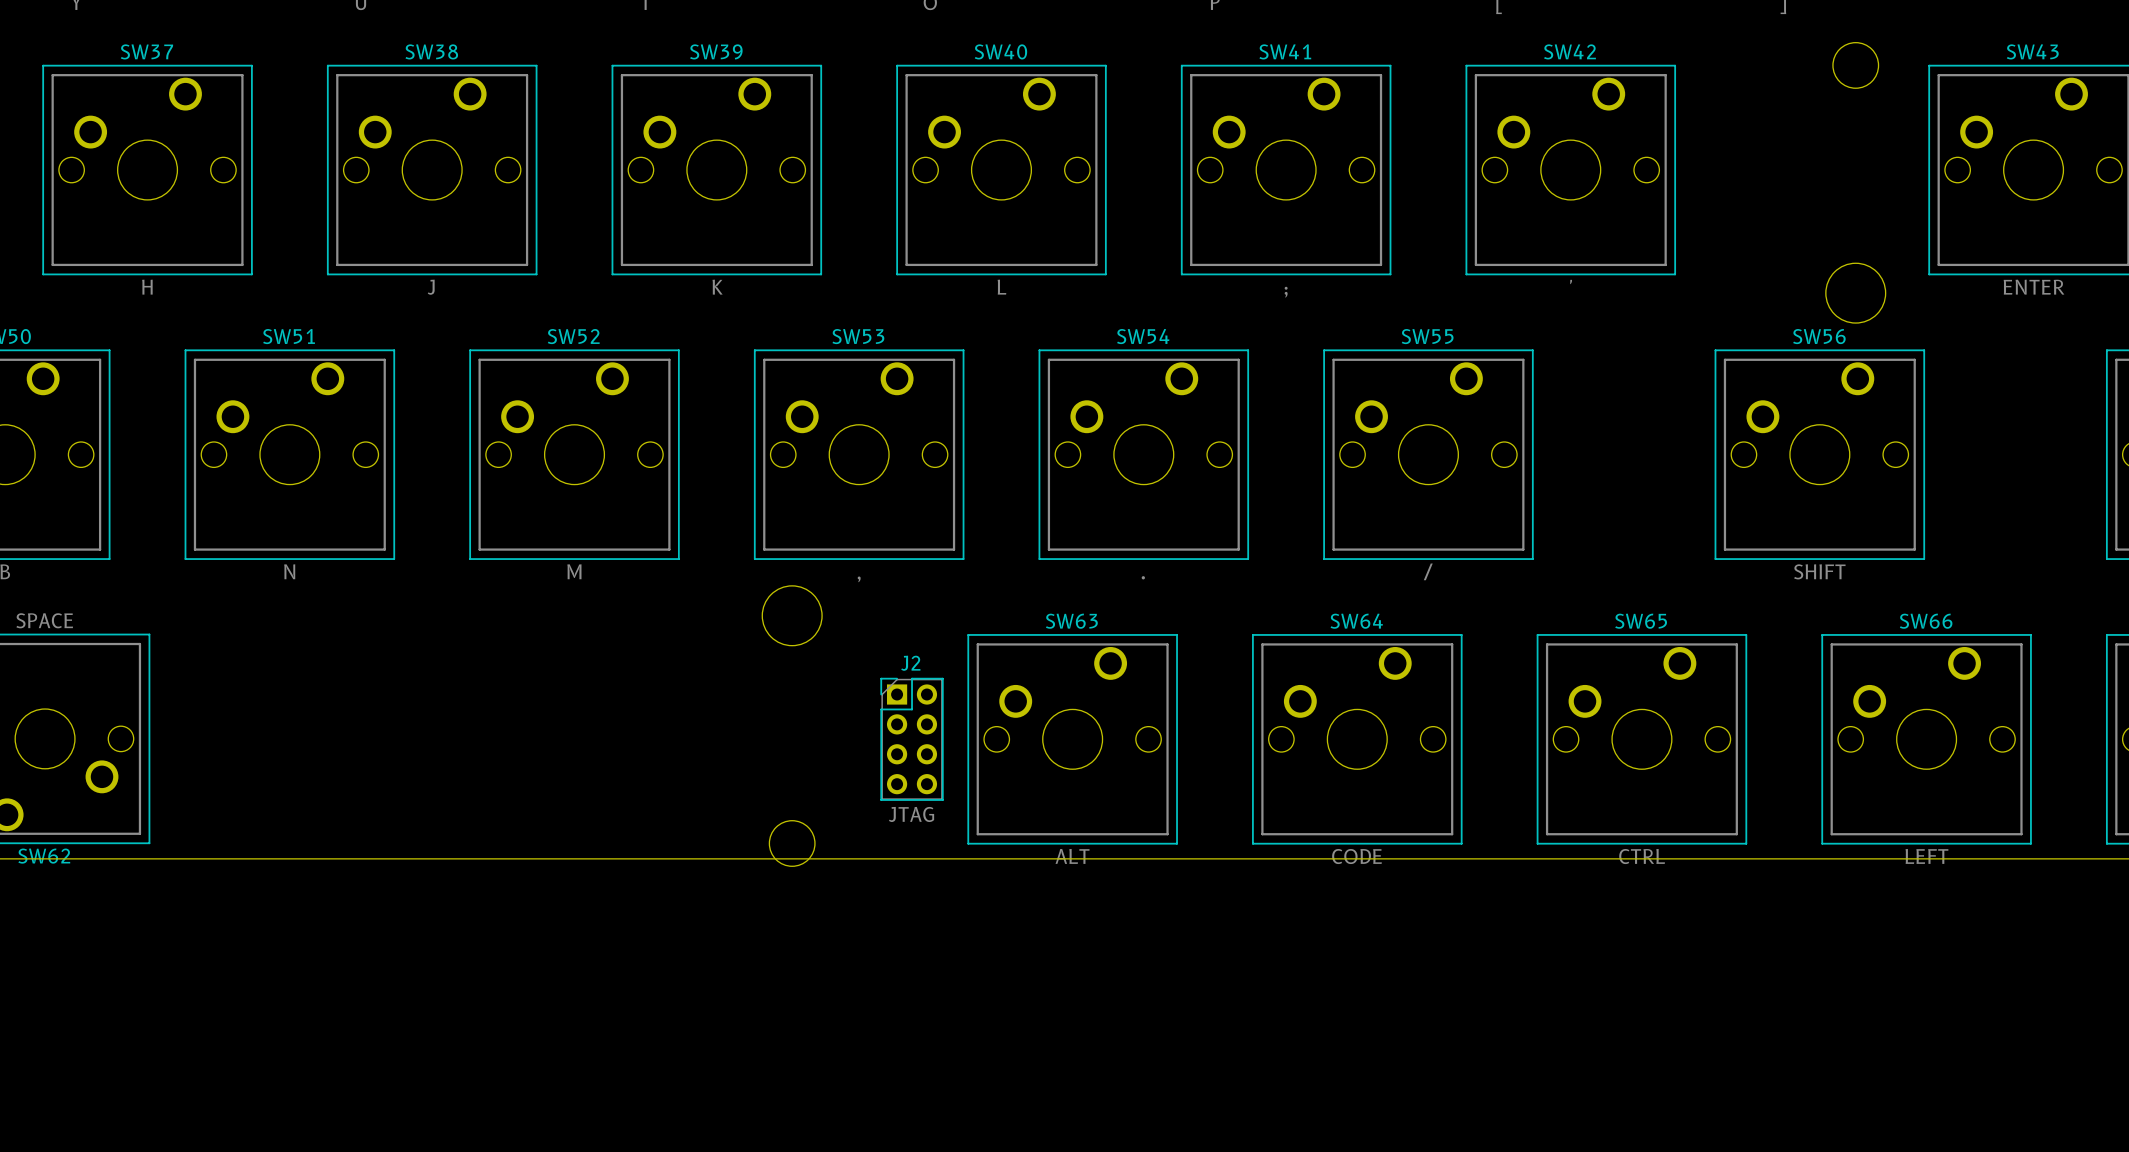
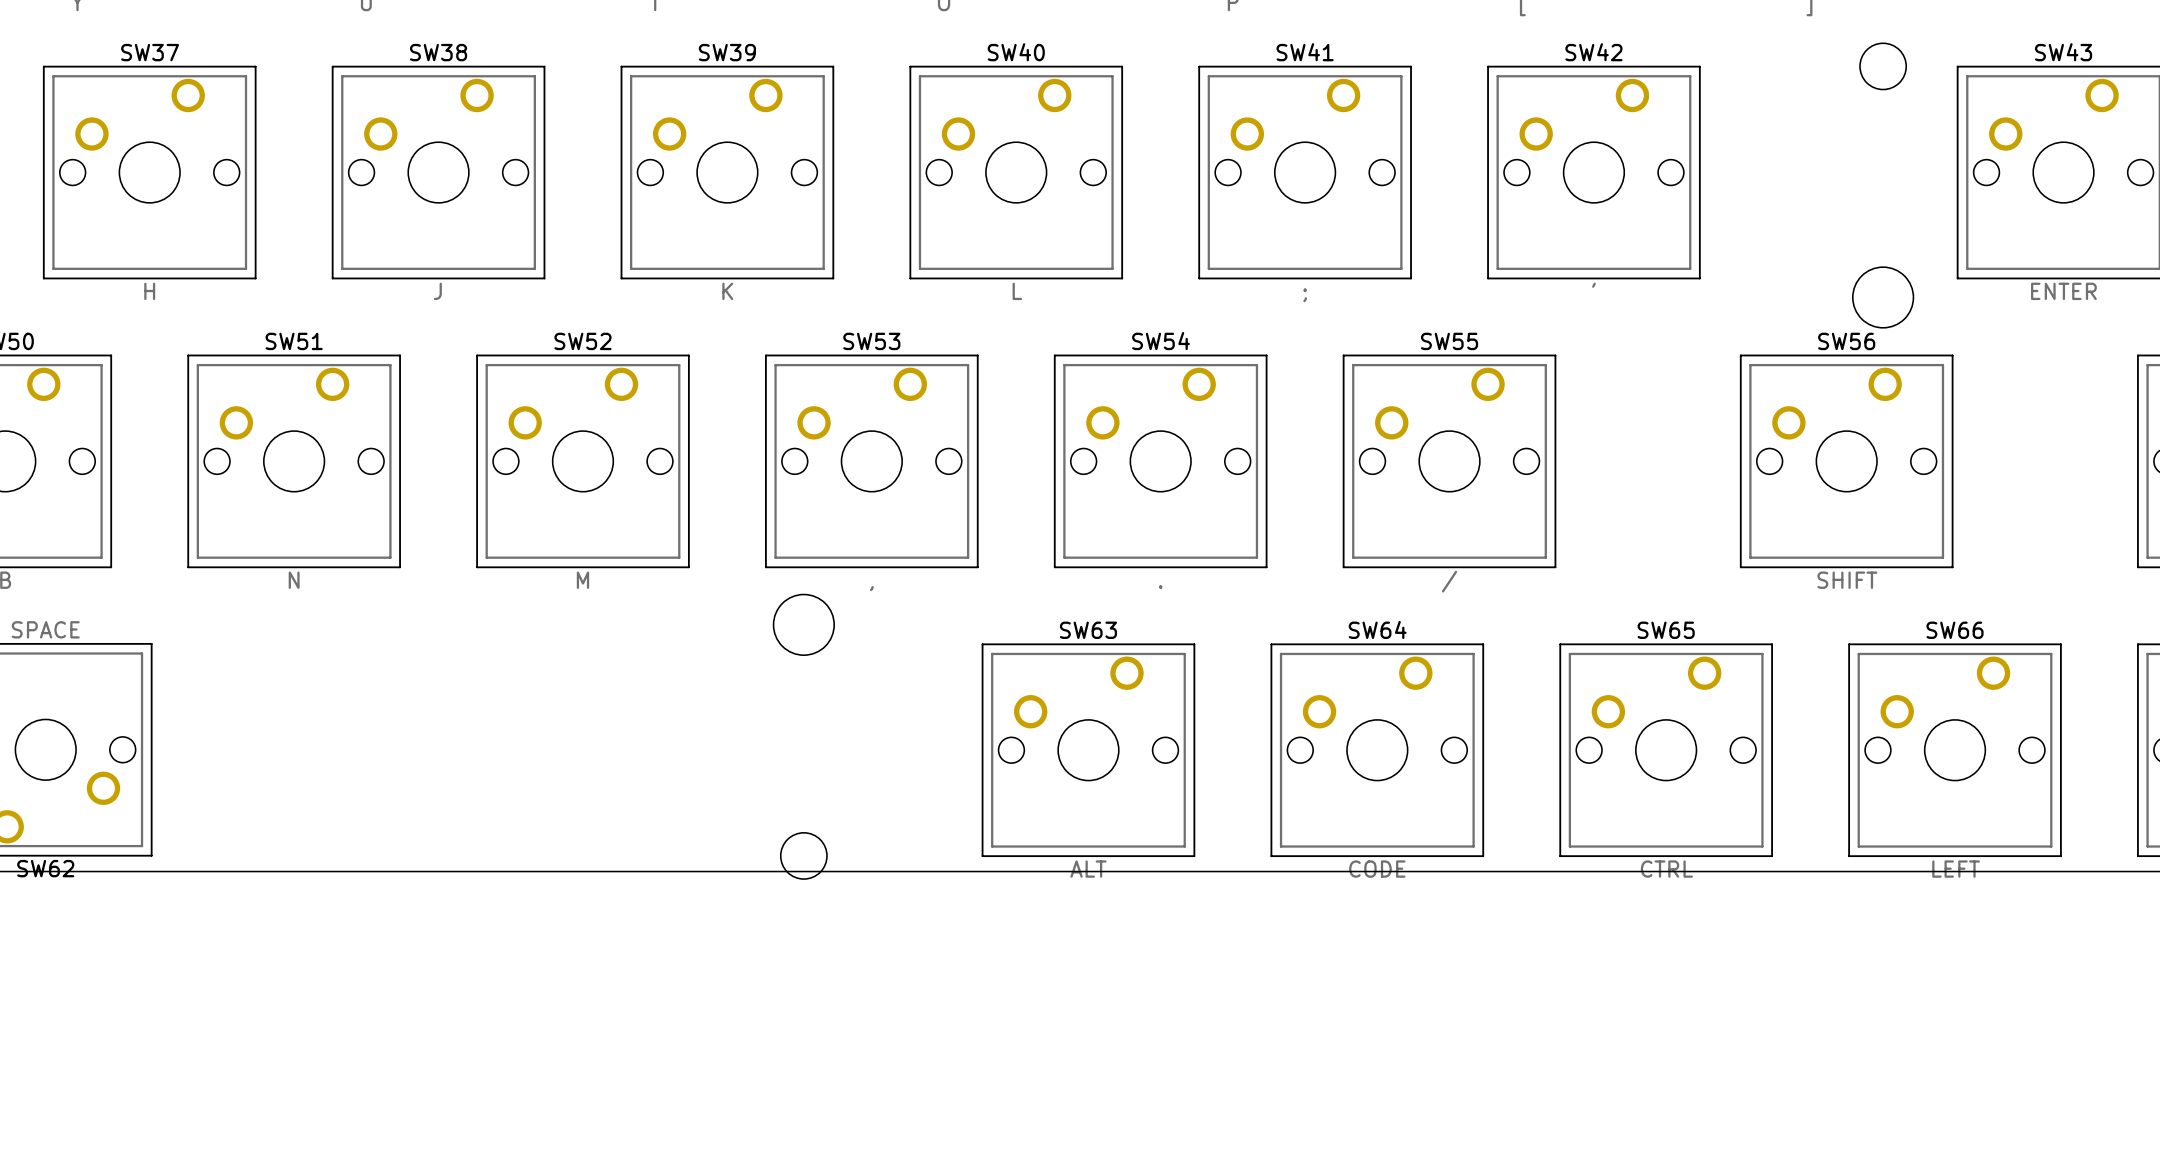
J2: JTAG (912, 739) -> none

